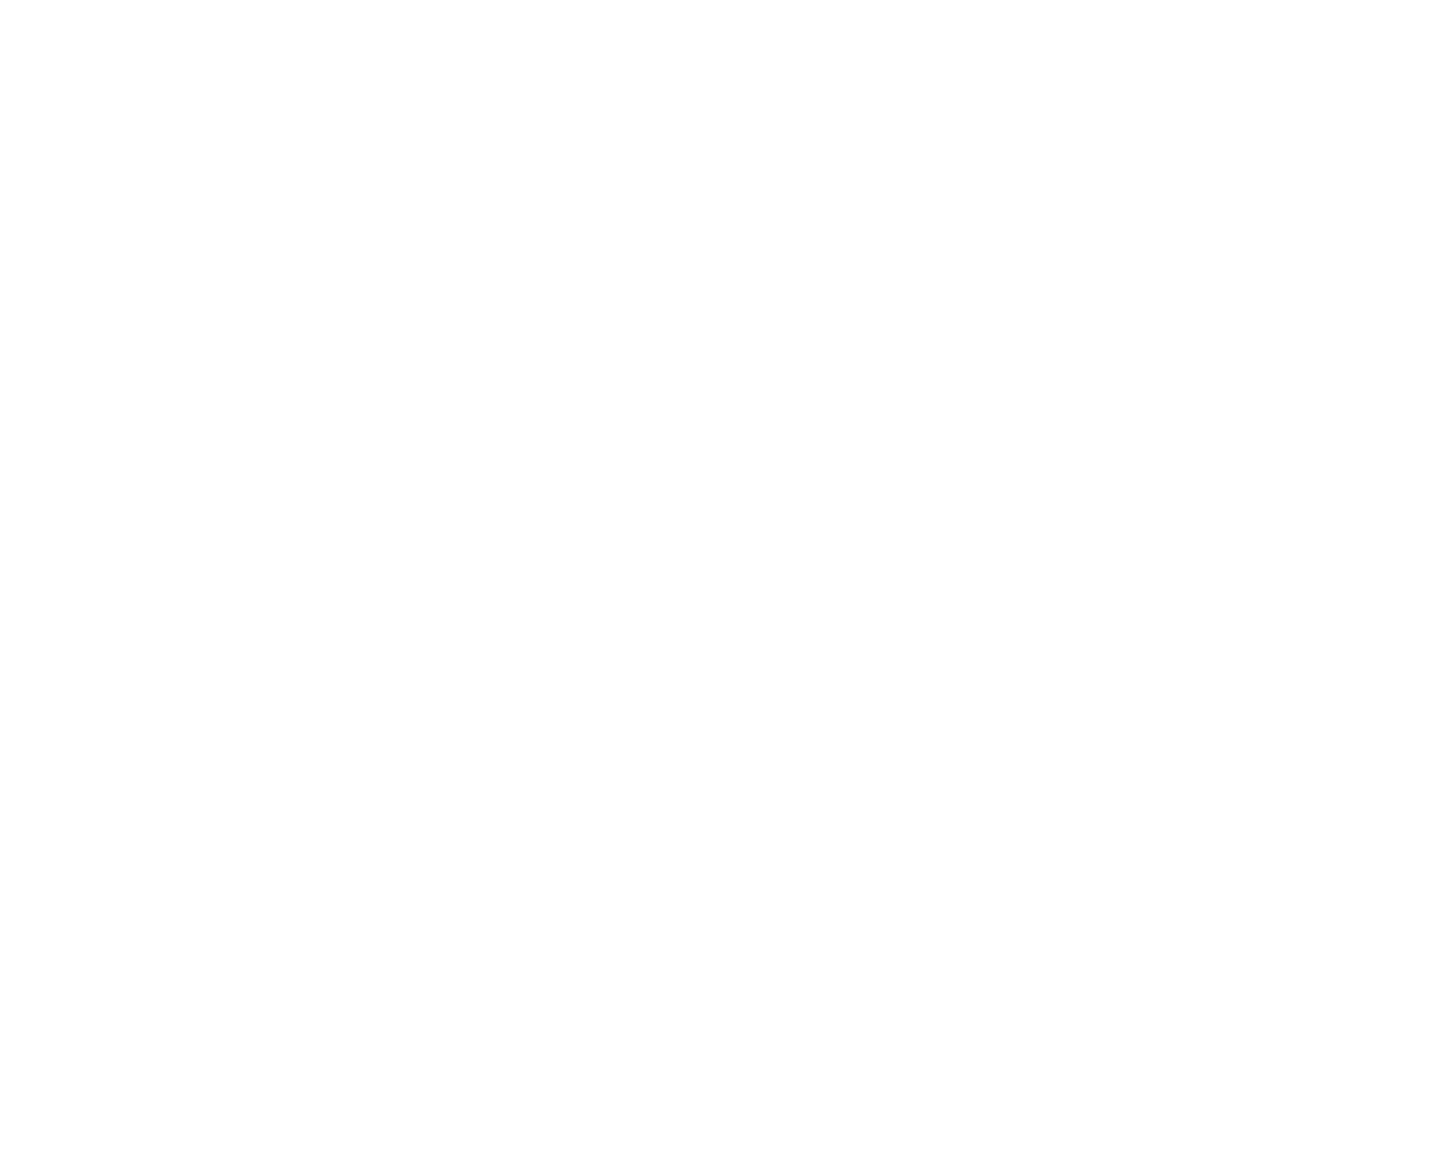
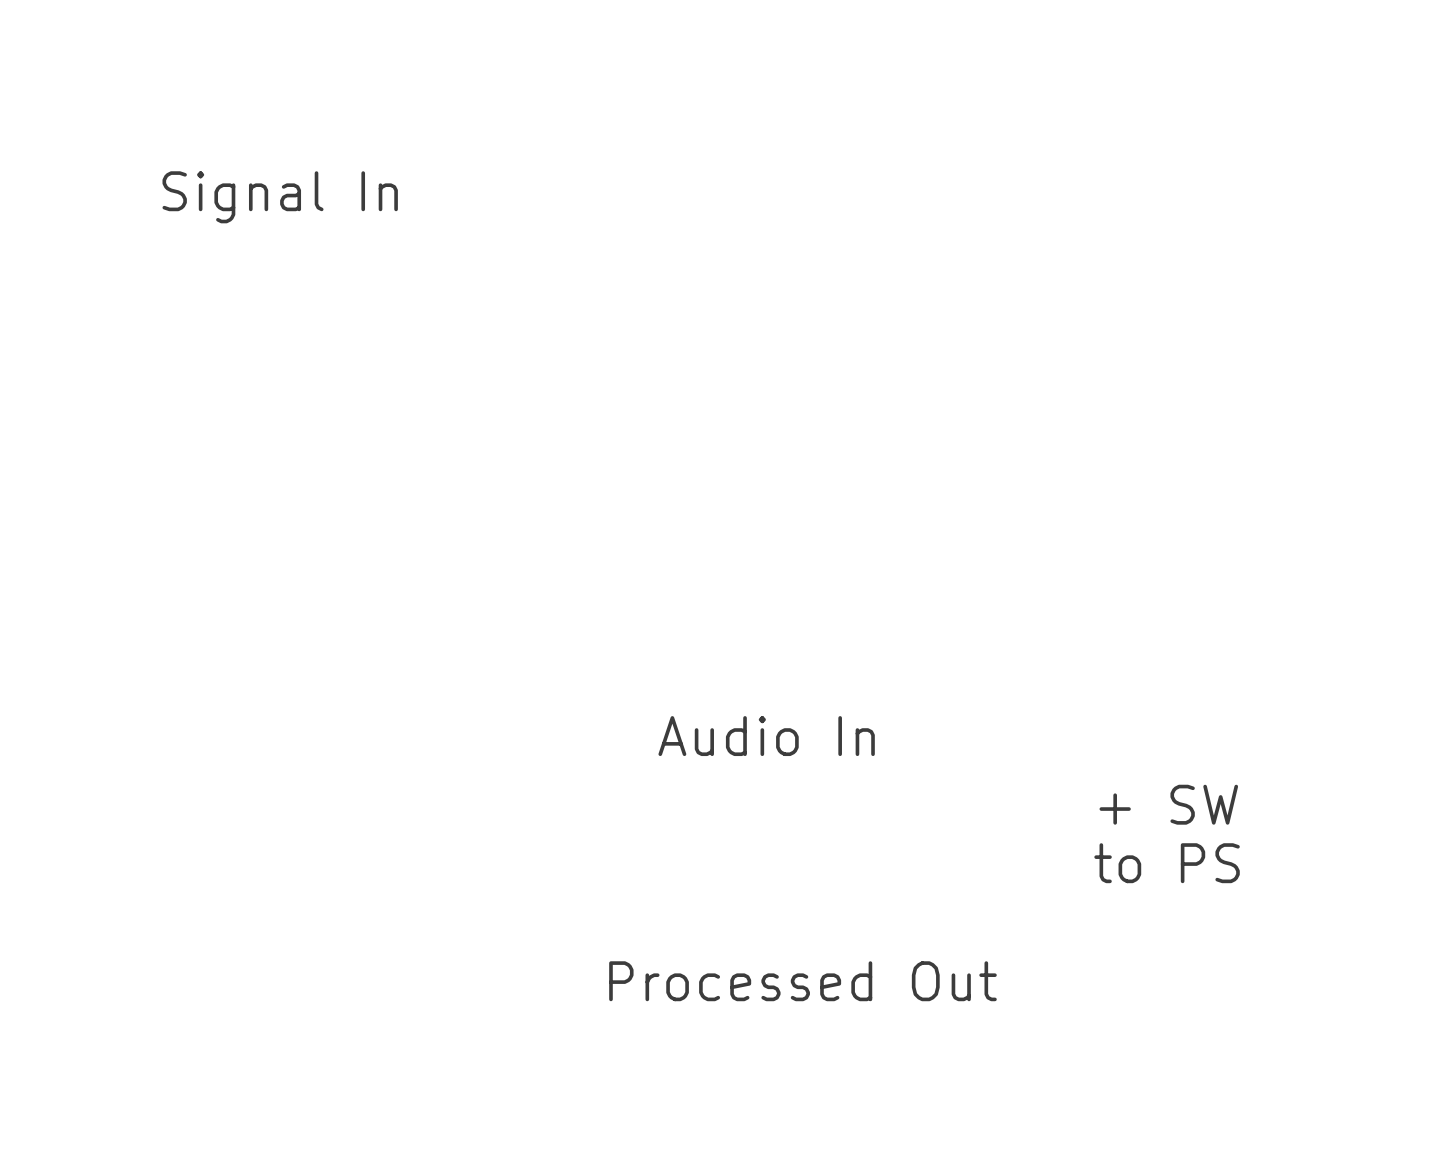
text: none -> Signal In (280, 197)
text: none -> Audio In (766, 736)
text: none -> + SW (1168, 804)
text: none -> to PS (1167, 863)
text: none -> Processed Out (802, 981)

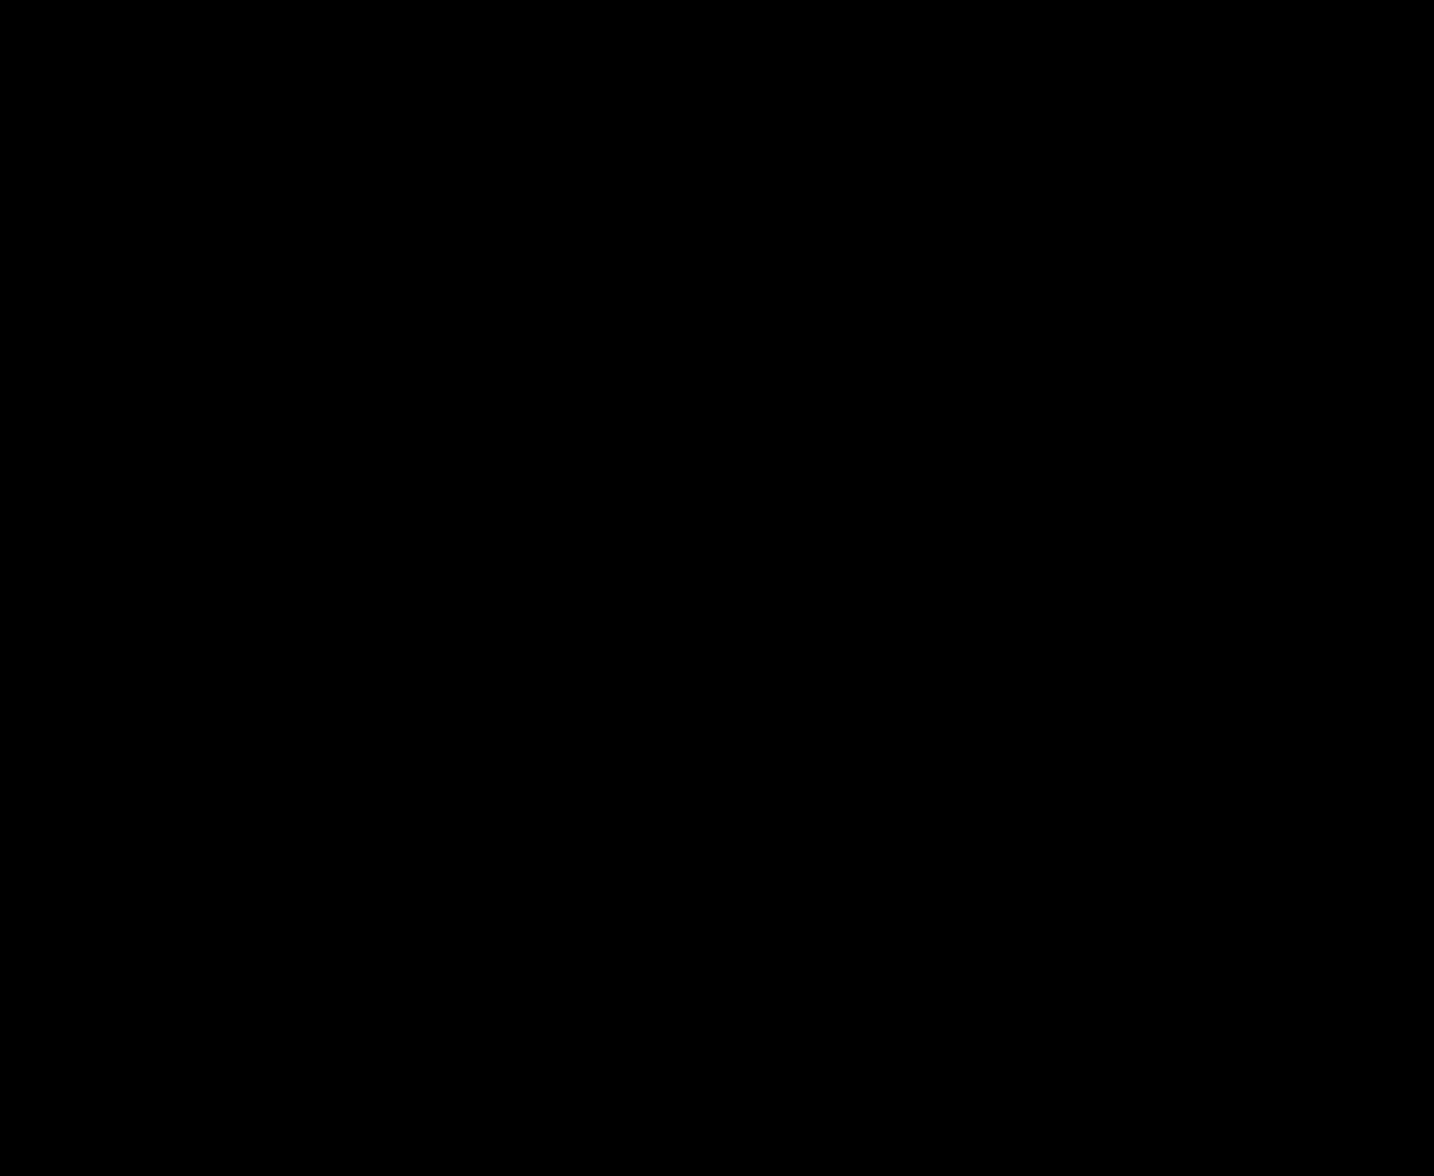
text: Signal In (280, 197) -> none
text: Audio In (766, 736) -> none
text: + SW (1168, 804) -> none
text: to PS (1167, 863) -> none
text: Processed Out (802, 981) -> none

